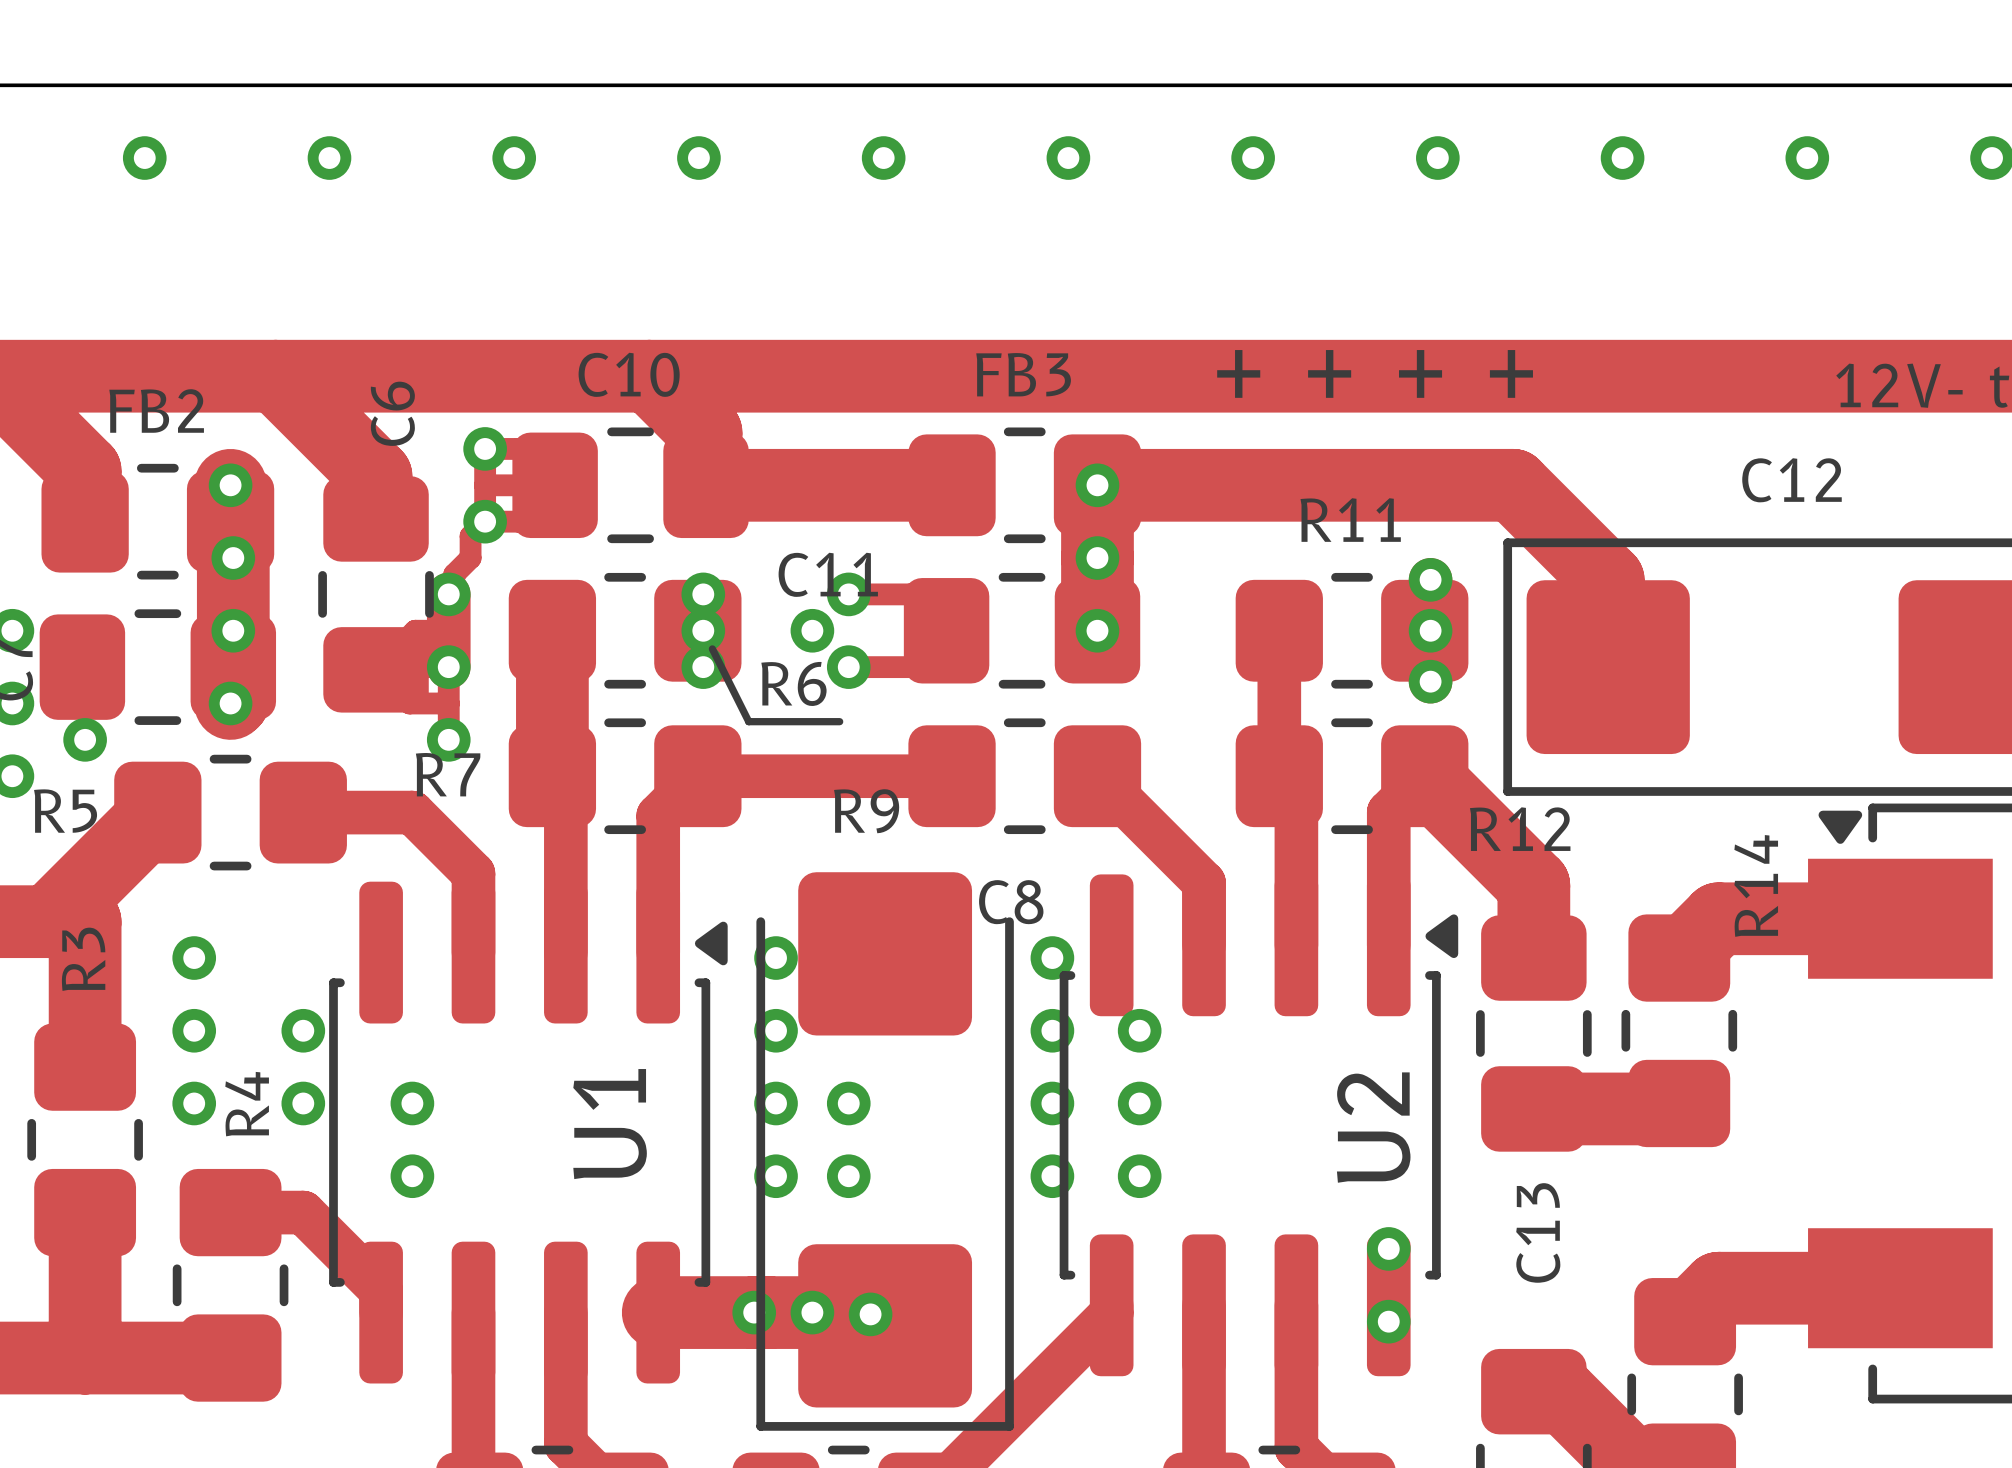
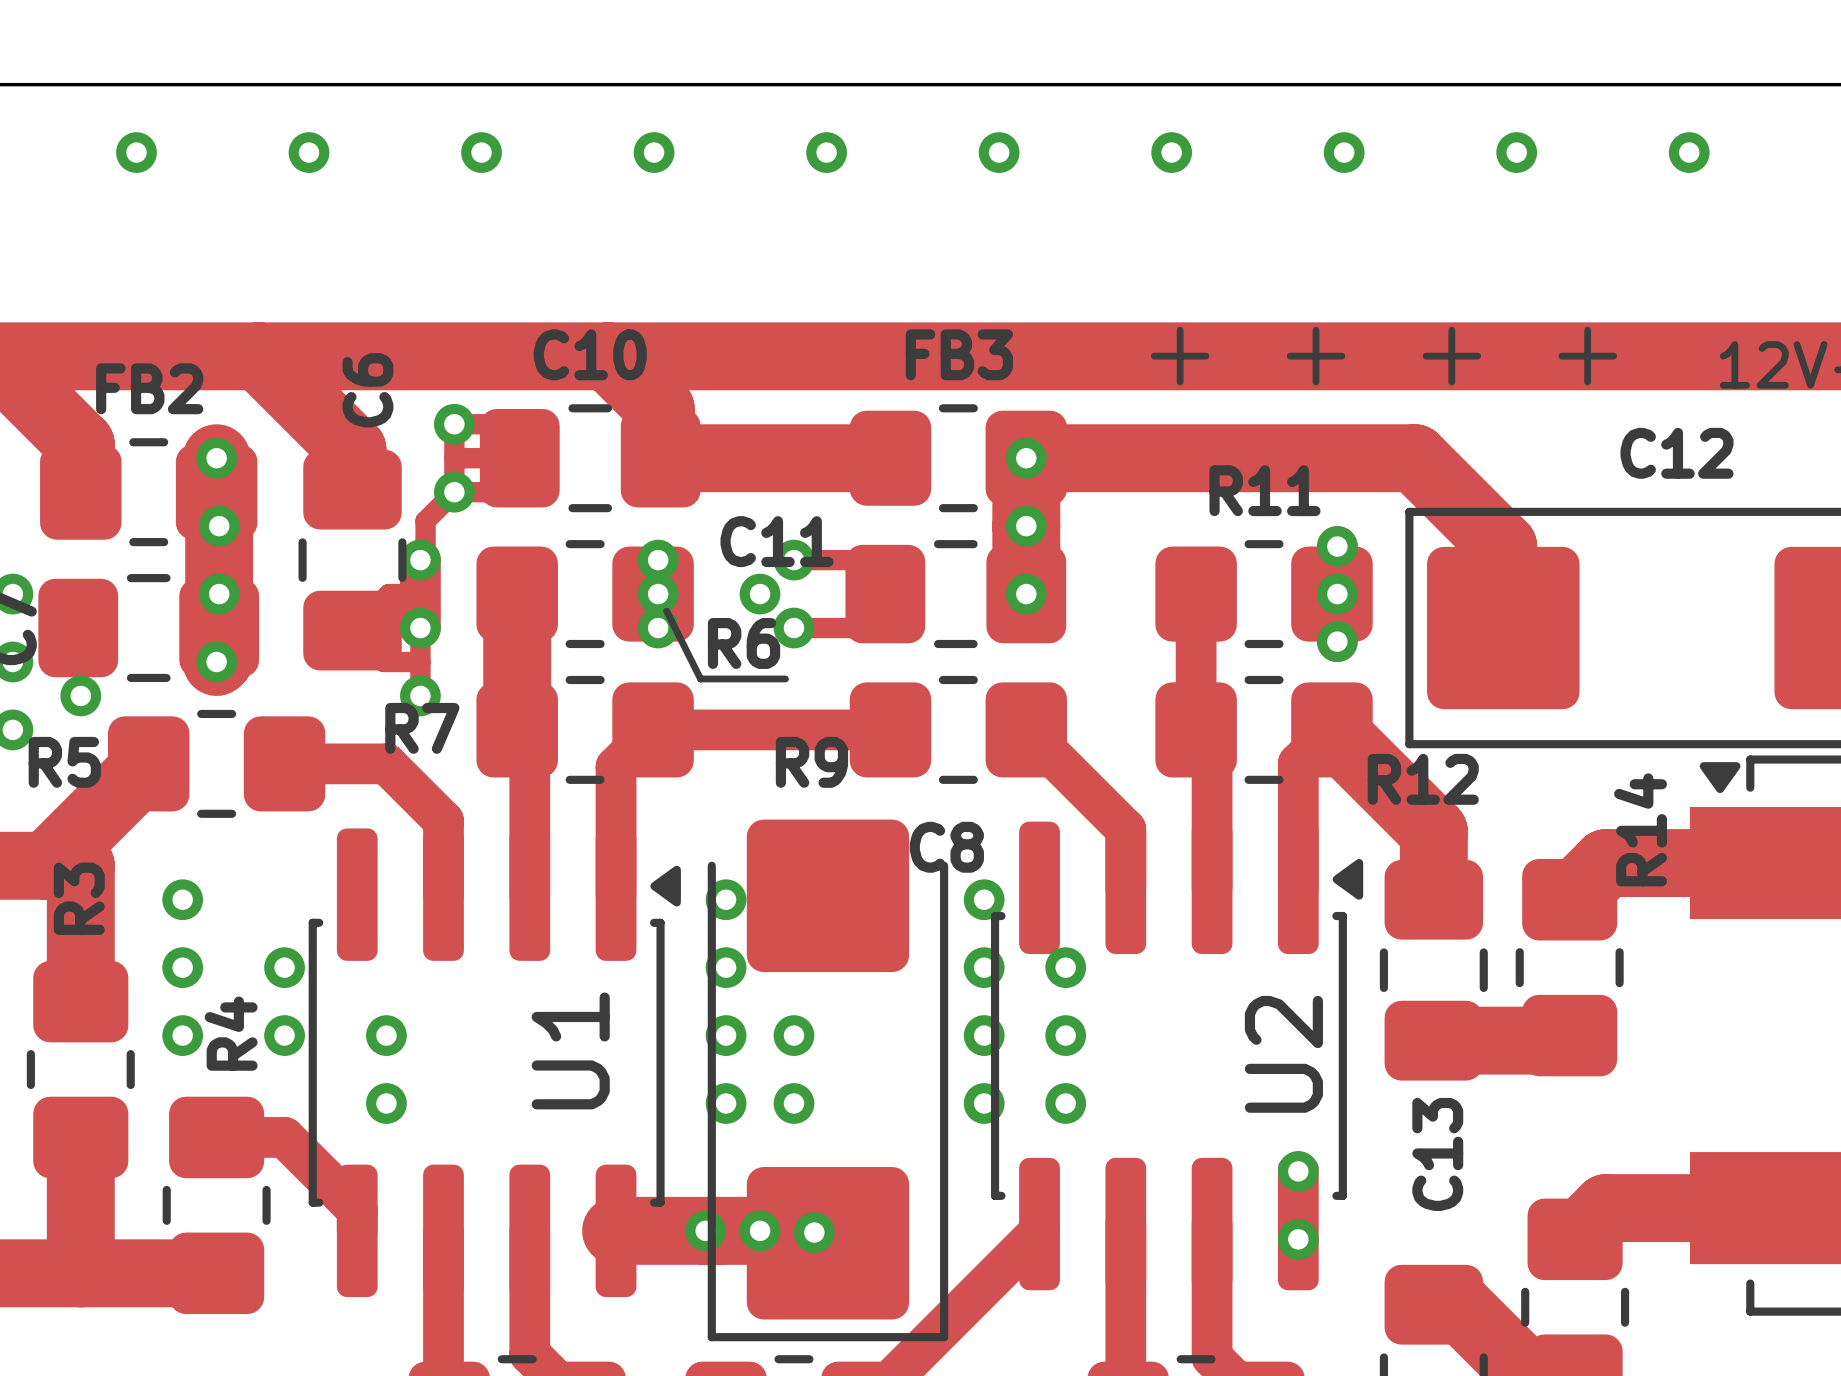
track: (470, 536) (470, 558) (454, 574) -> (440, 505) (425, 520) (425, 541)

